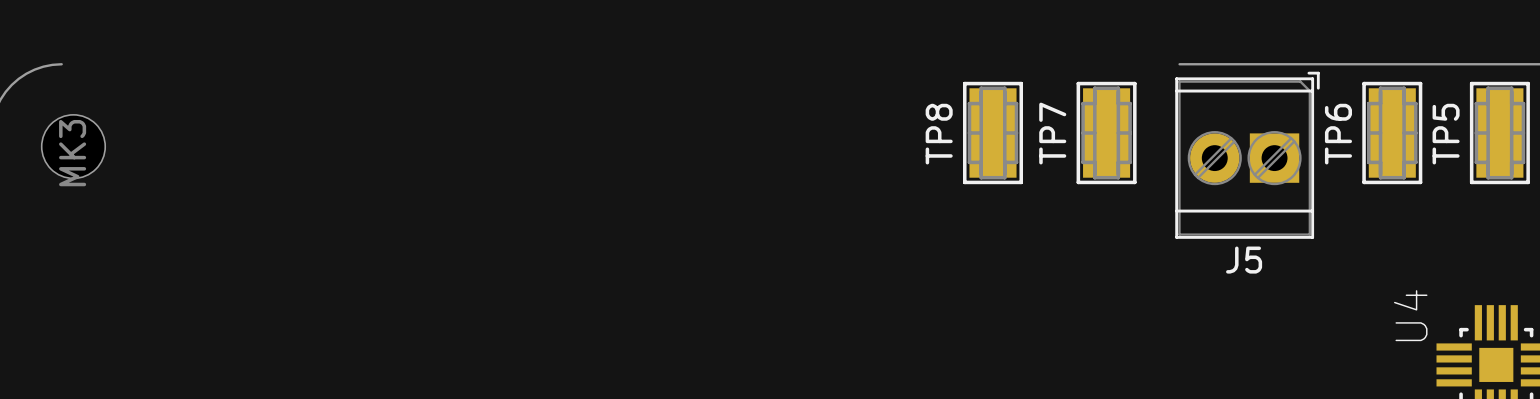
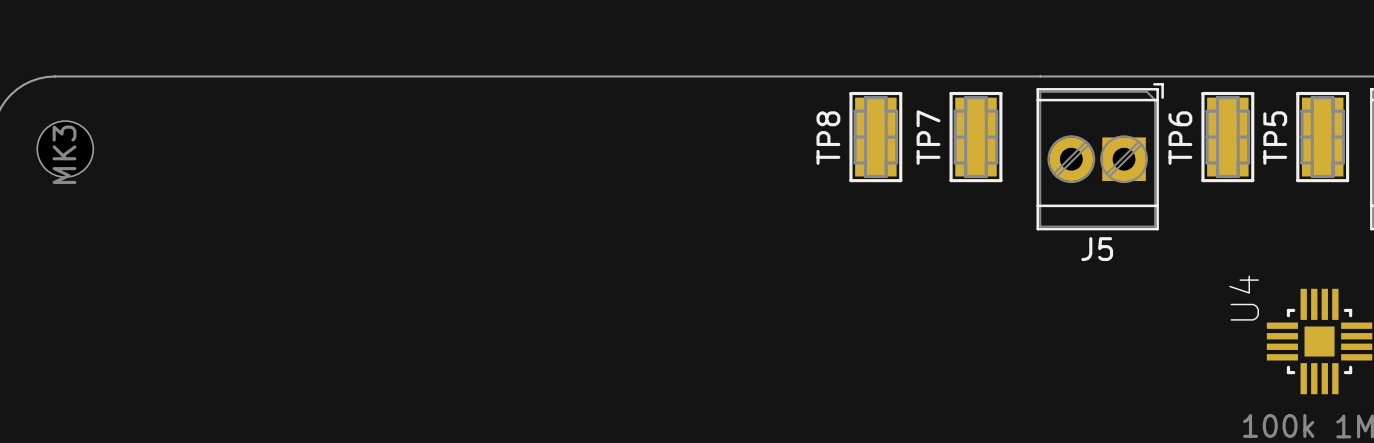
board edge: none -> (54, 76) (1040, 76)

